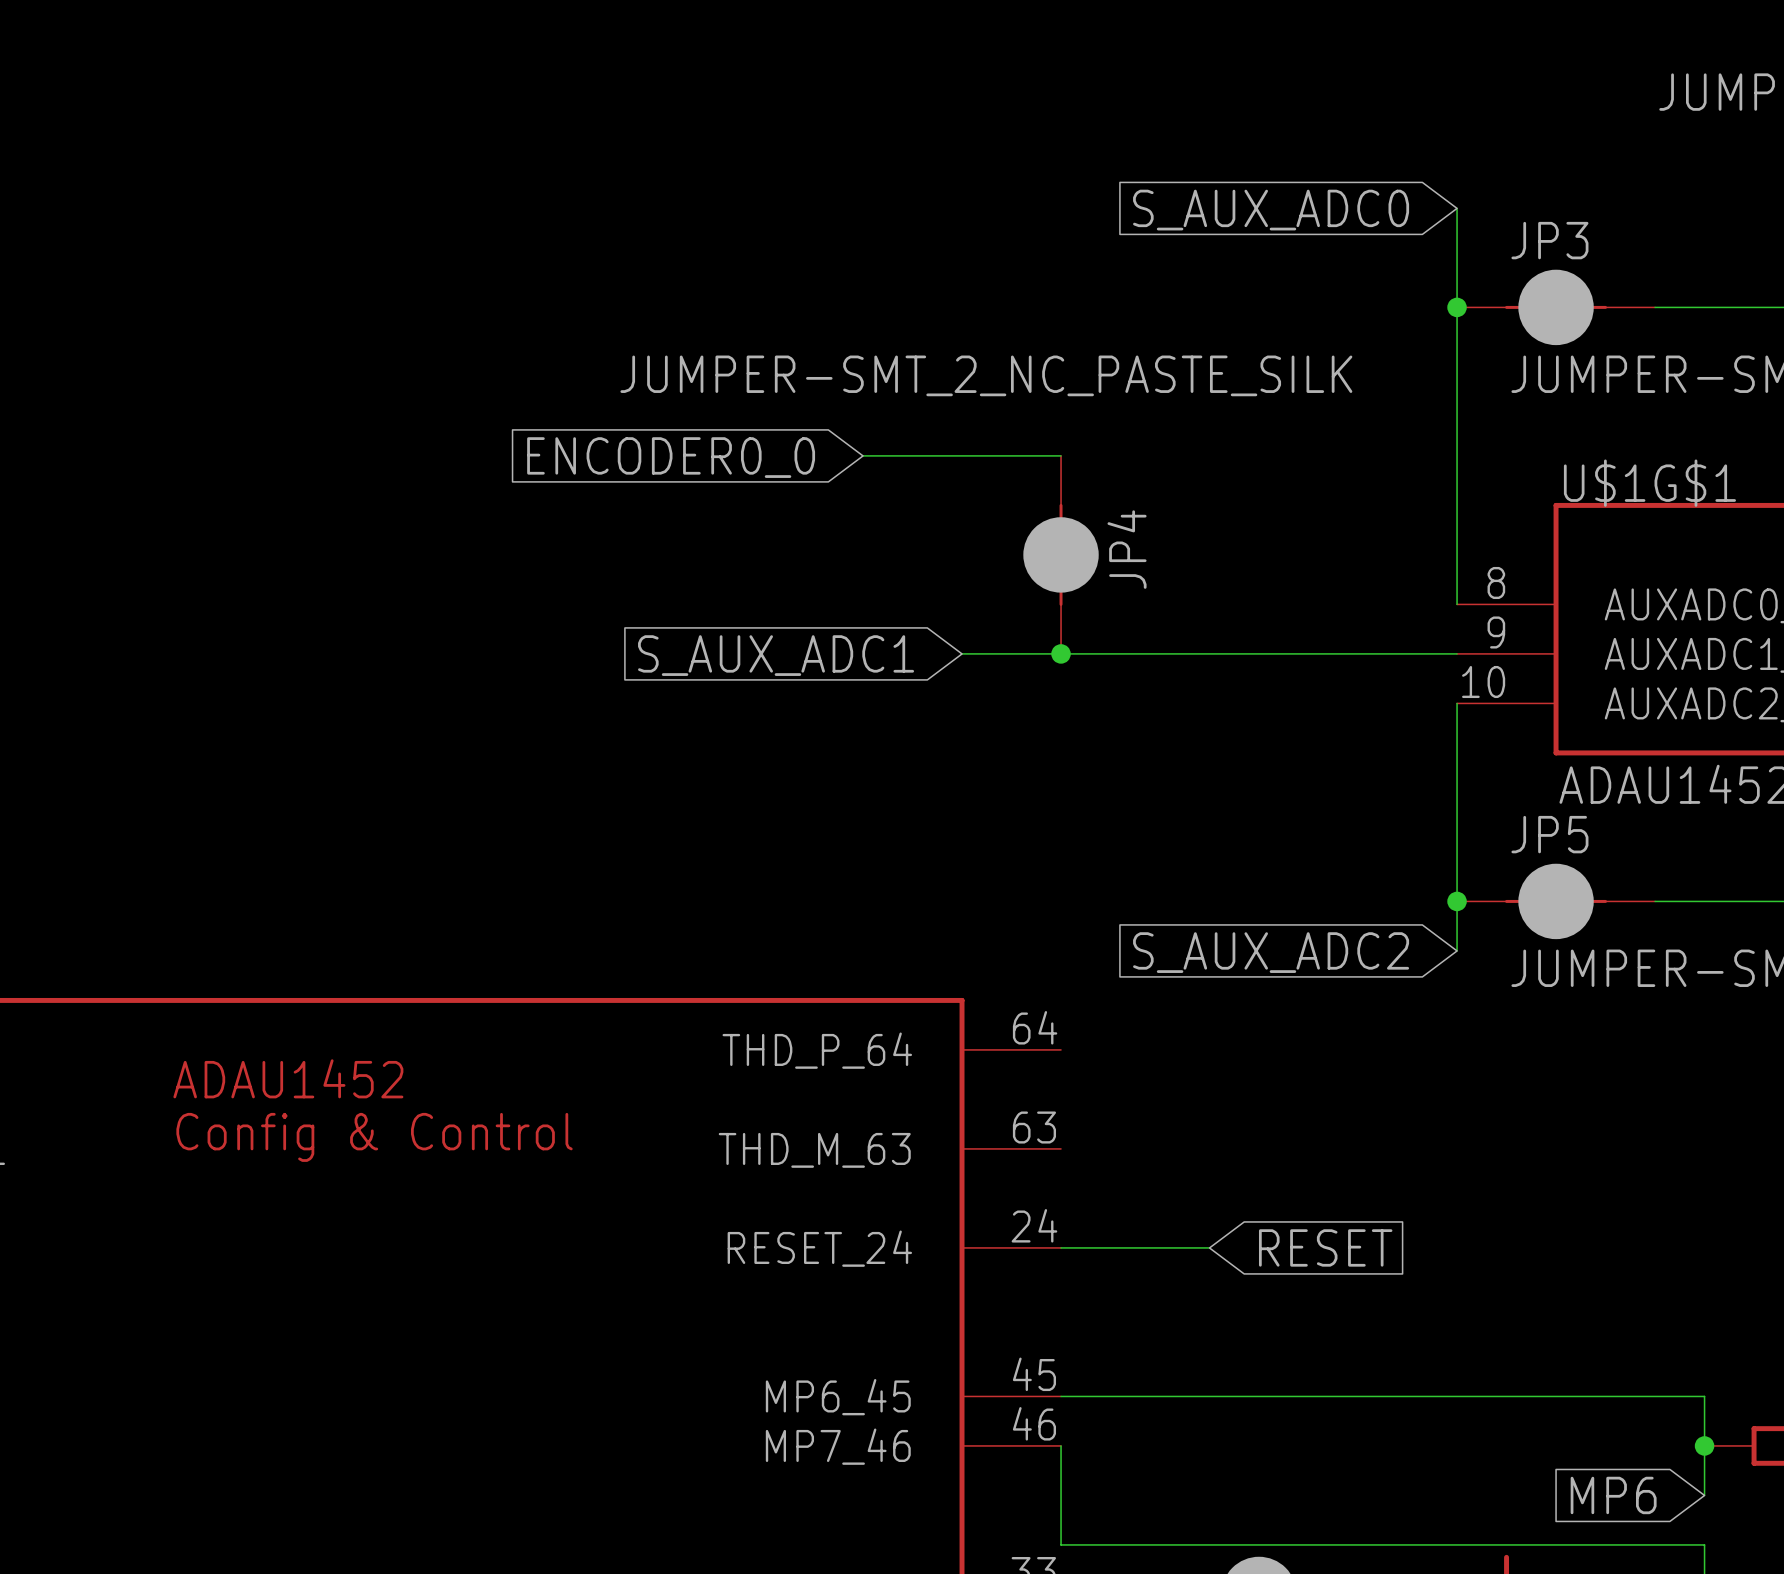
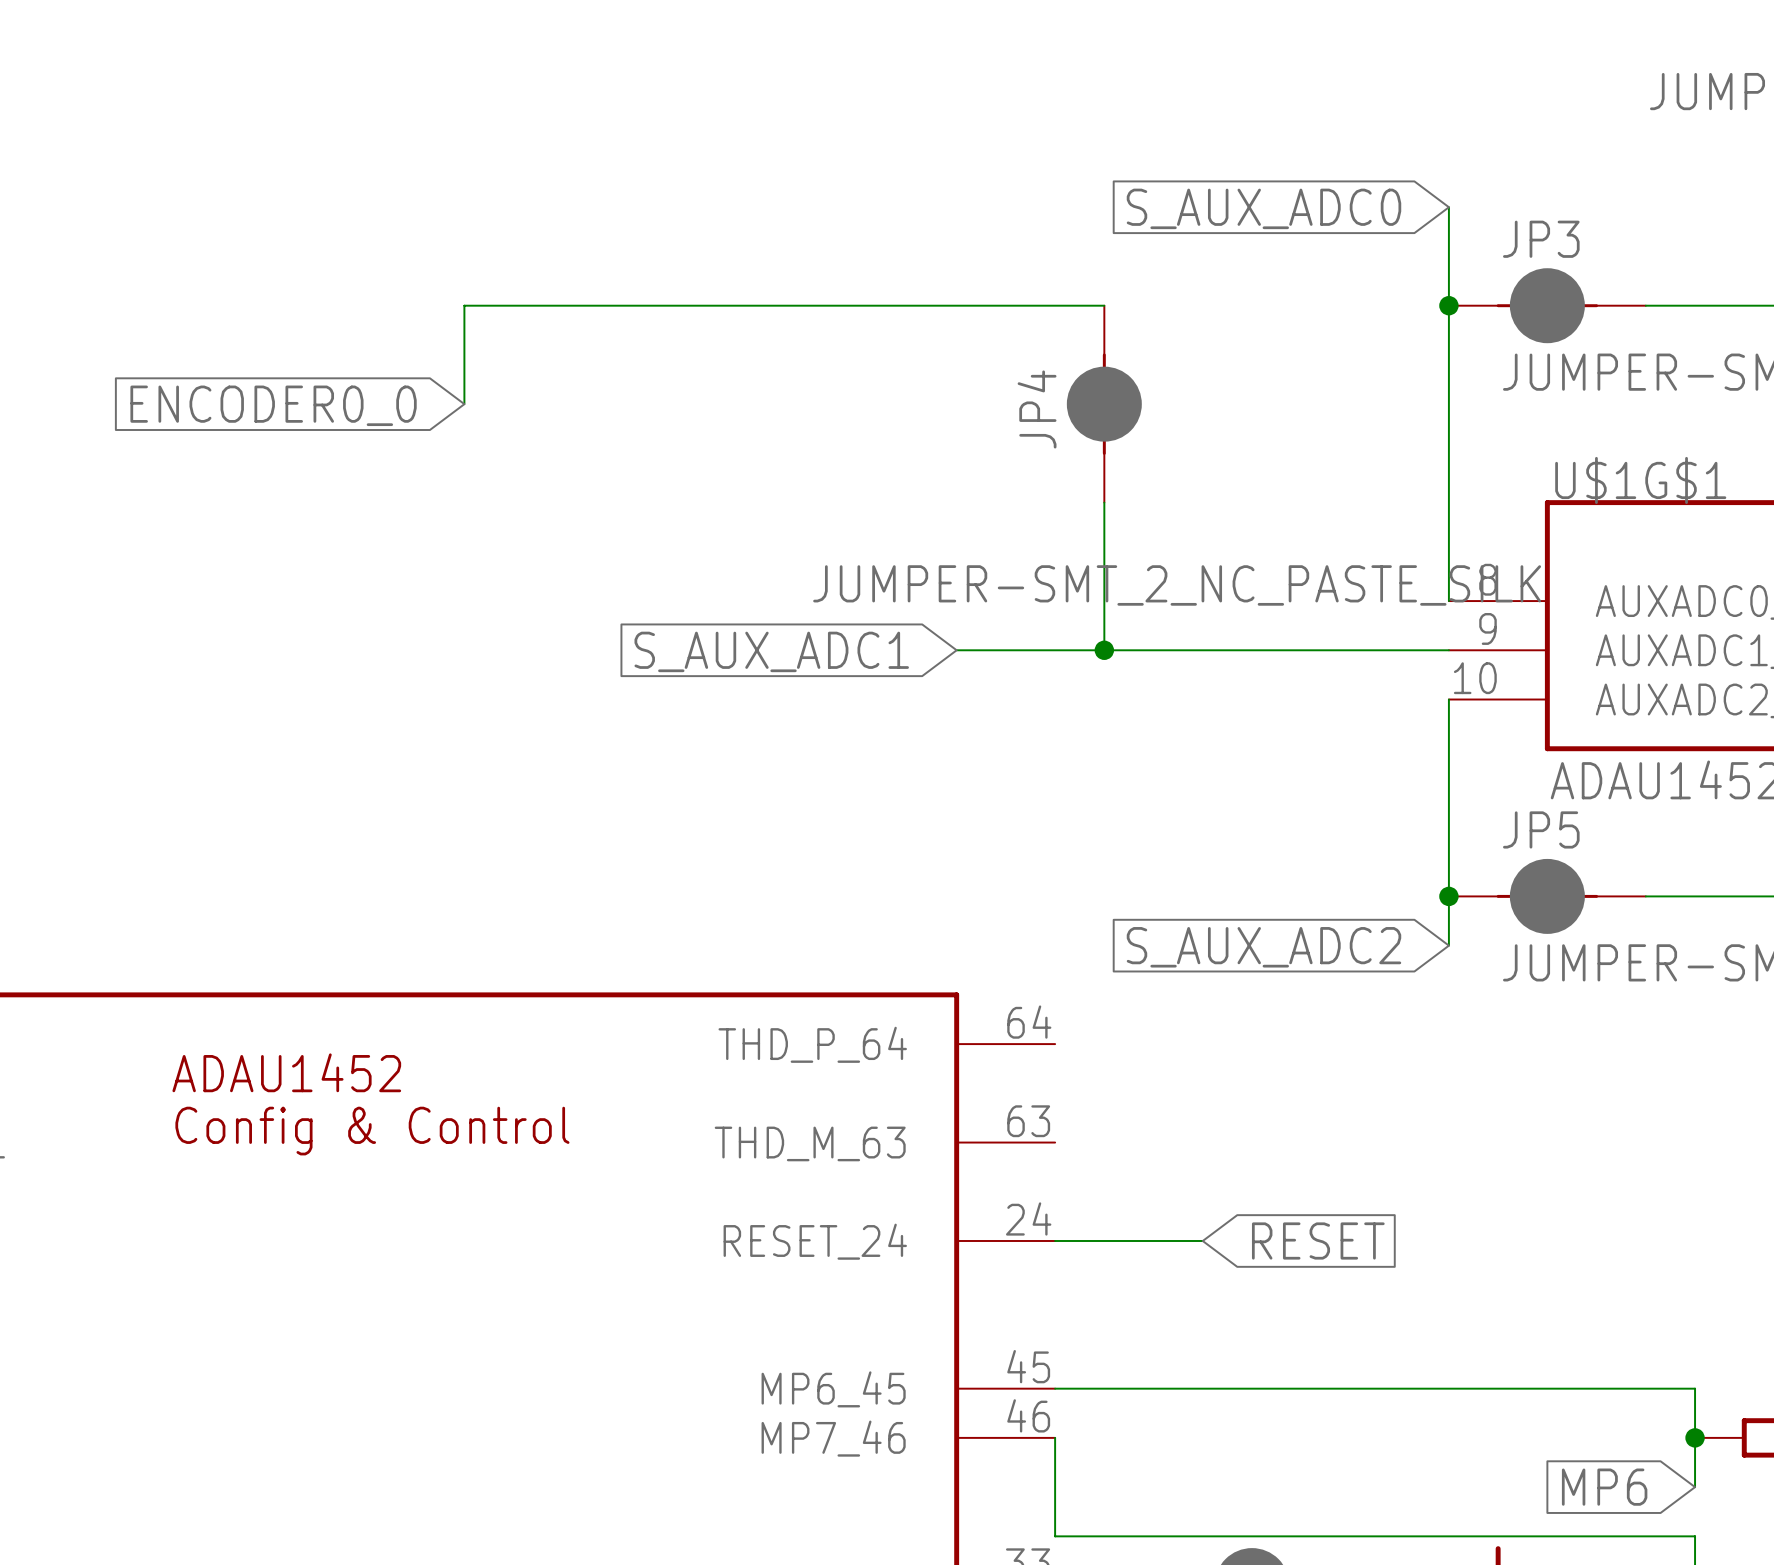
wire: none -> (1104, 305) (464, 305) (464, 404)
JP4 value position: JUMPER-SMT_2_NC_PASTE_SILK (986, 375) -> JUMPER-SMT_2_NC_PASTE_SILK (1177, 585)
wire: (863, 455) (1061, 455) -> none
global label position: ENCODER0_0 (671, 457) -> ENCODER0_0 (273, 405)
wire: none -> (1104, 502) (1104, 650)
JP4 name position: JP4 (1127, 549) -> JP4 (1037, 409)
JP4 position: (1061, 554) -> (1104, 404)
junction position: (1061, 653) -> (1104, 650)

